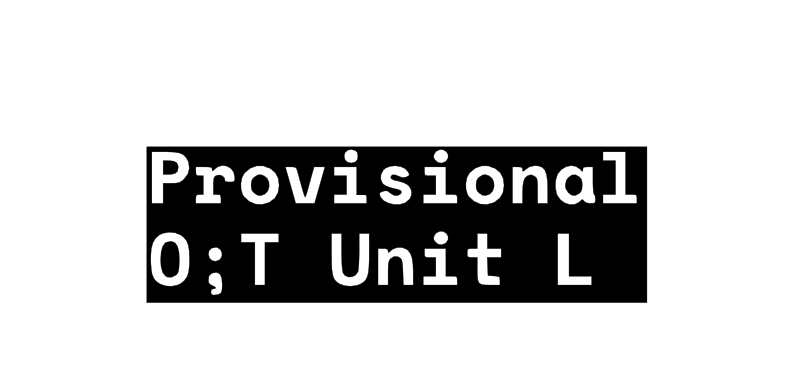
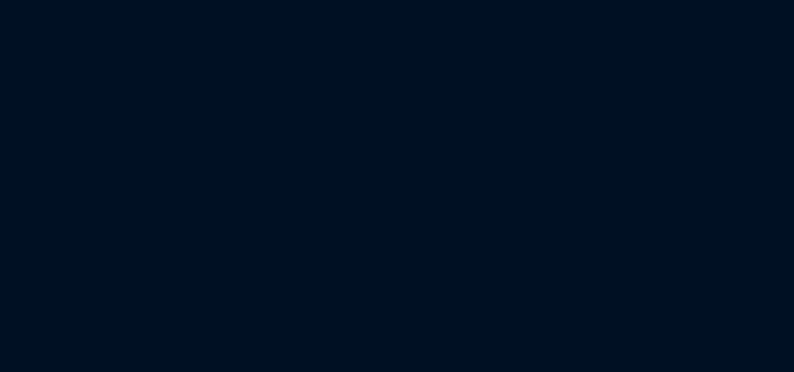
drawing: [146, 146, 648, 303] -> none

